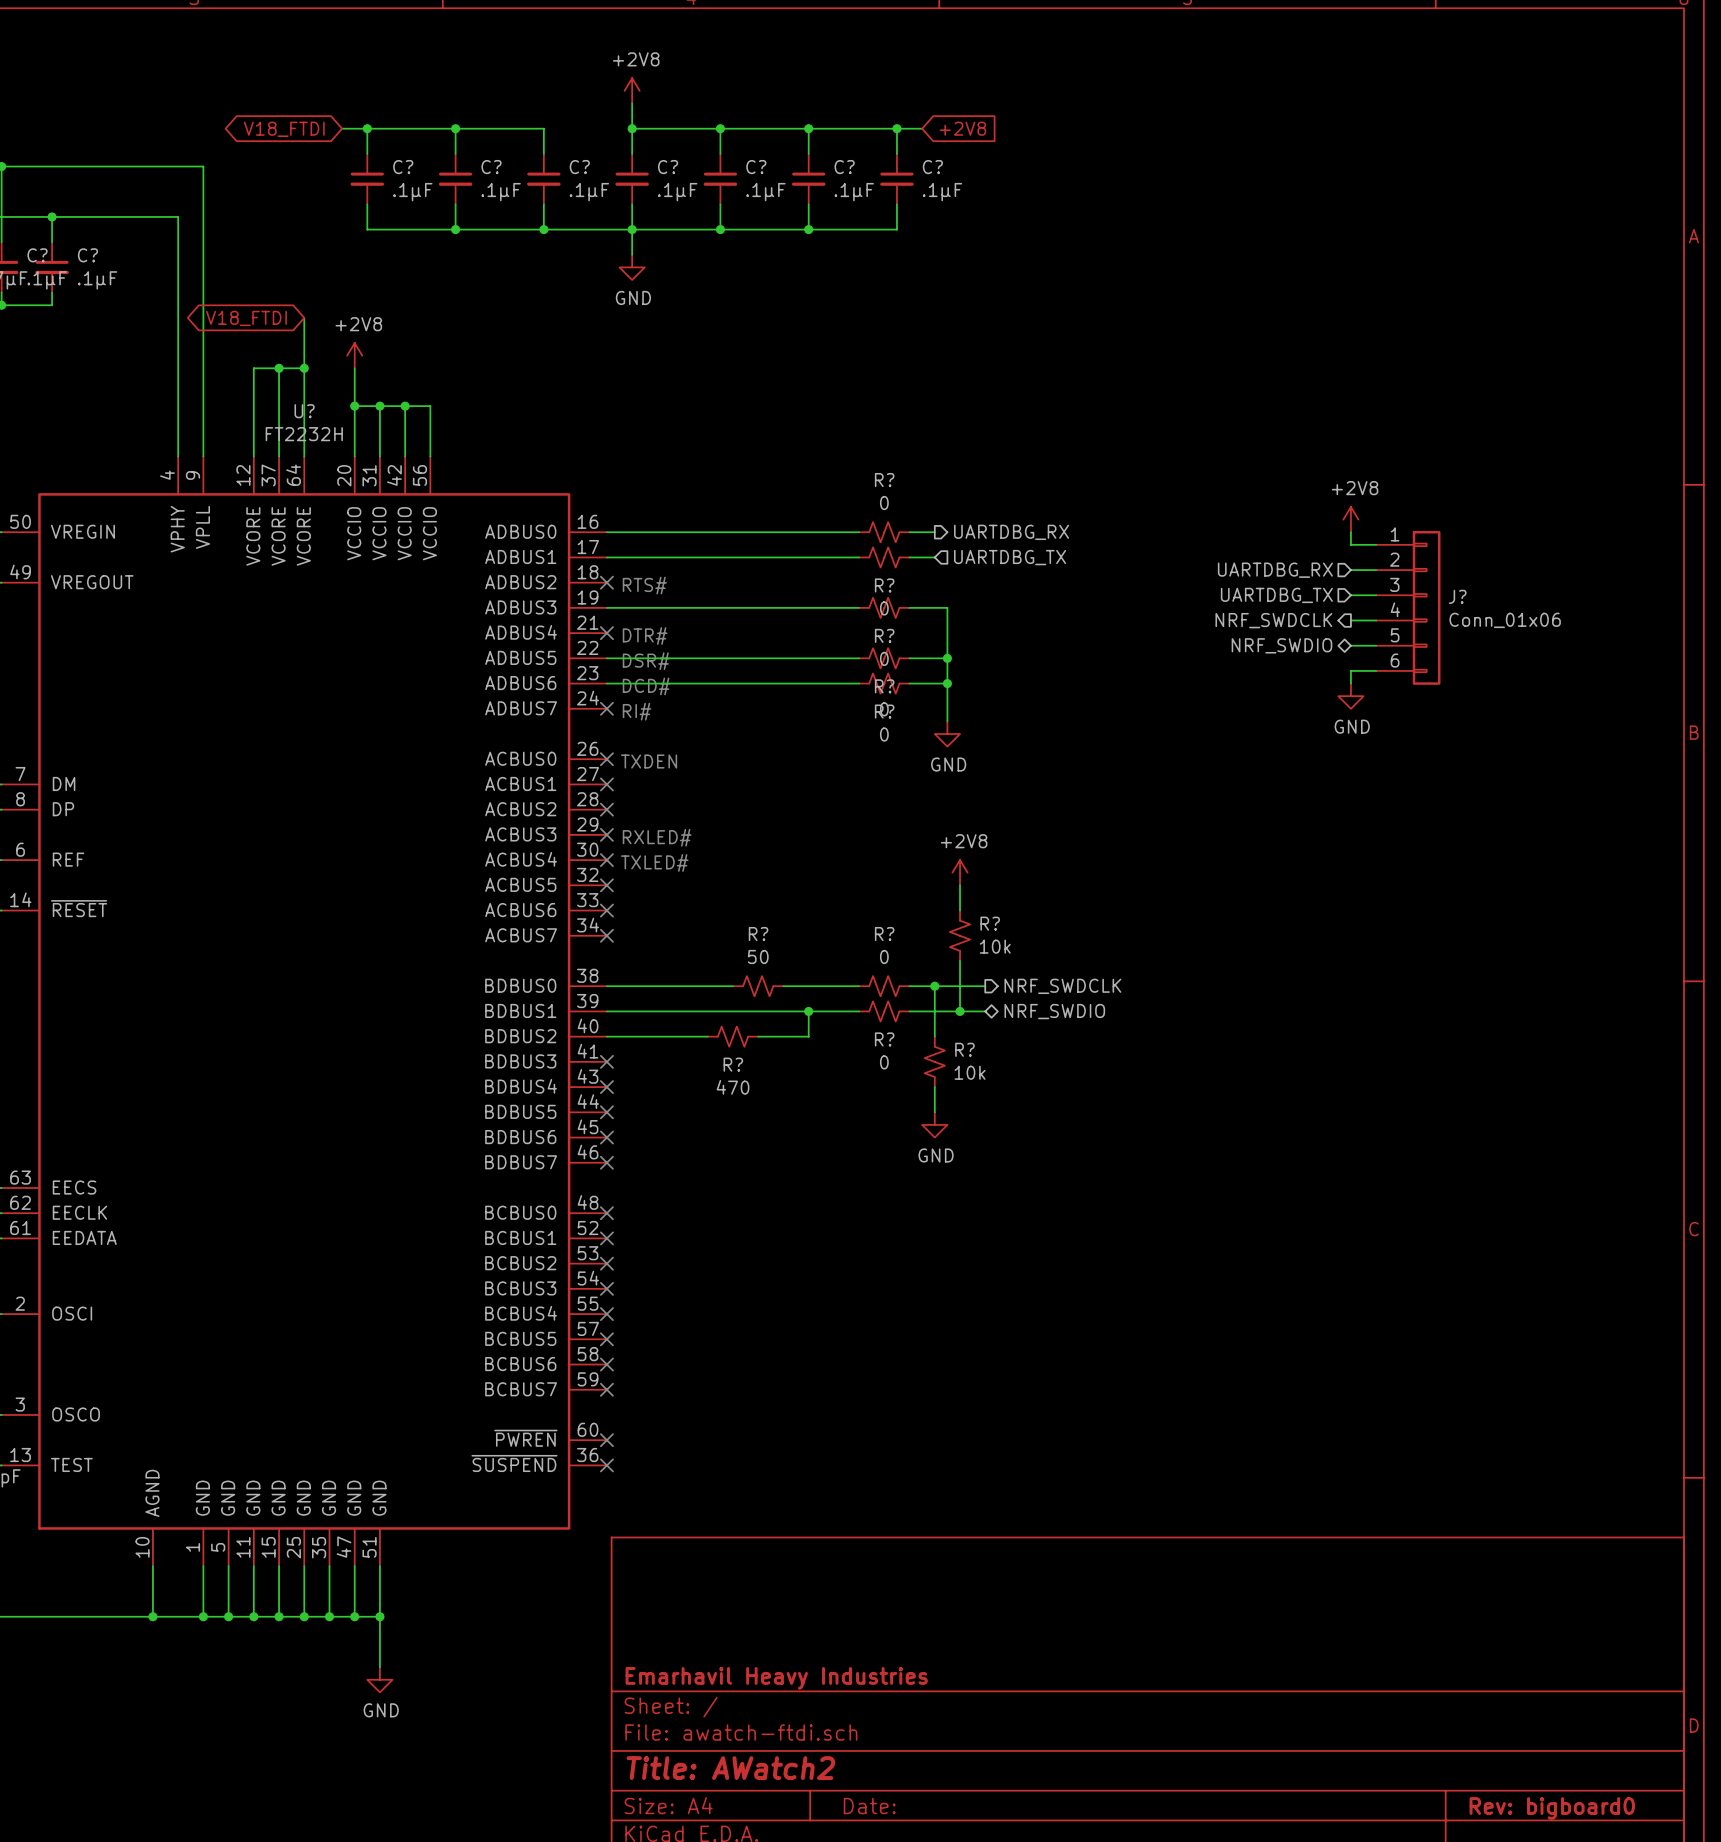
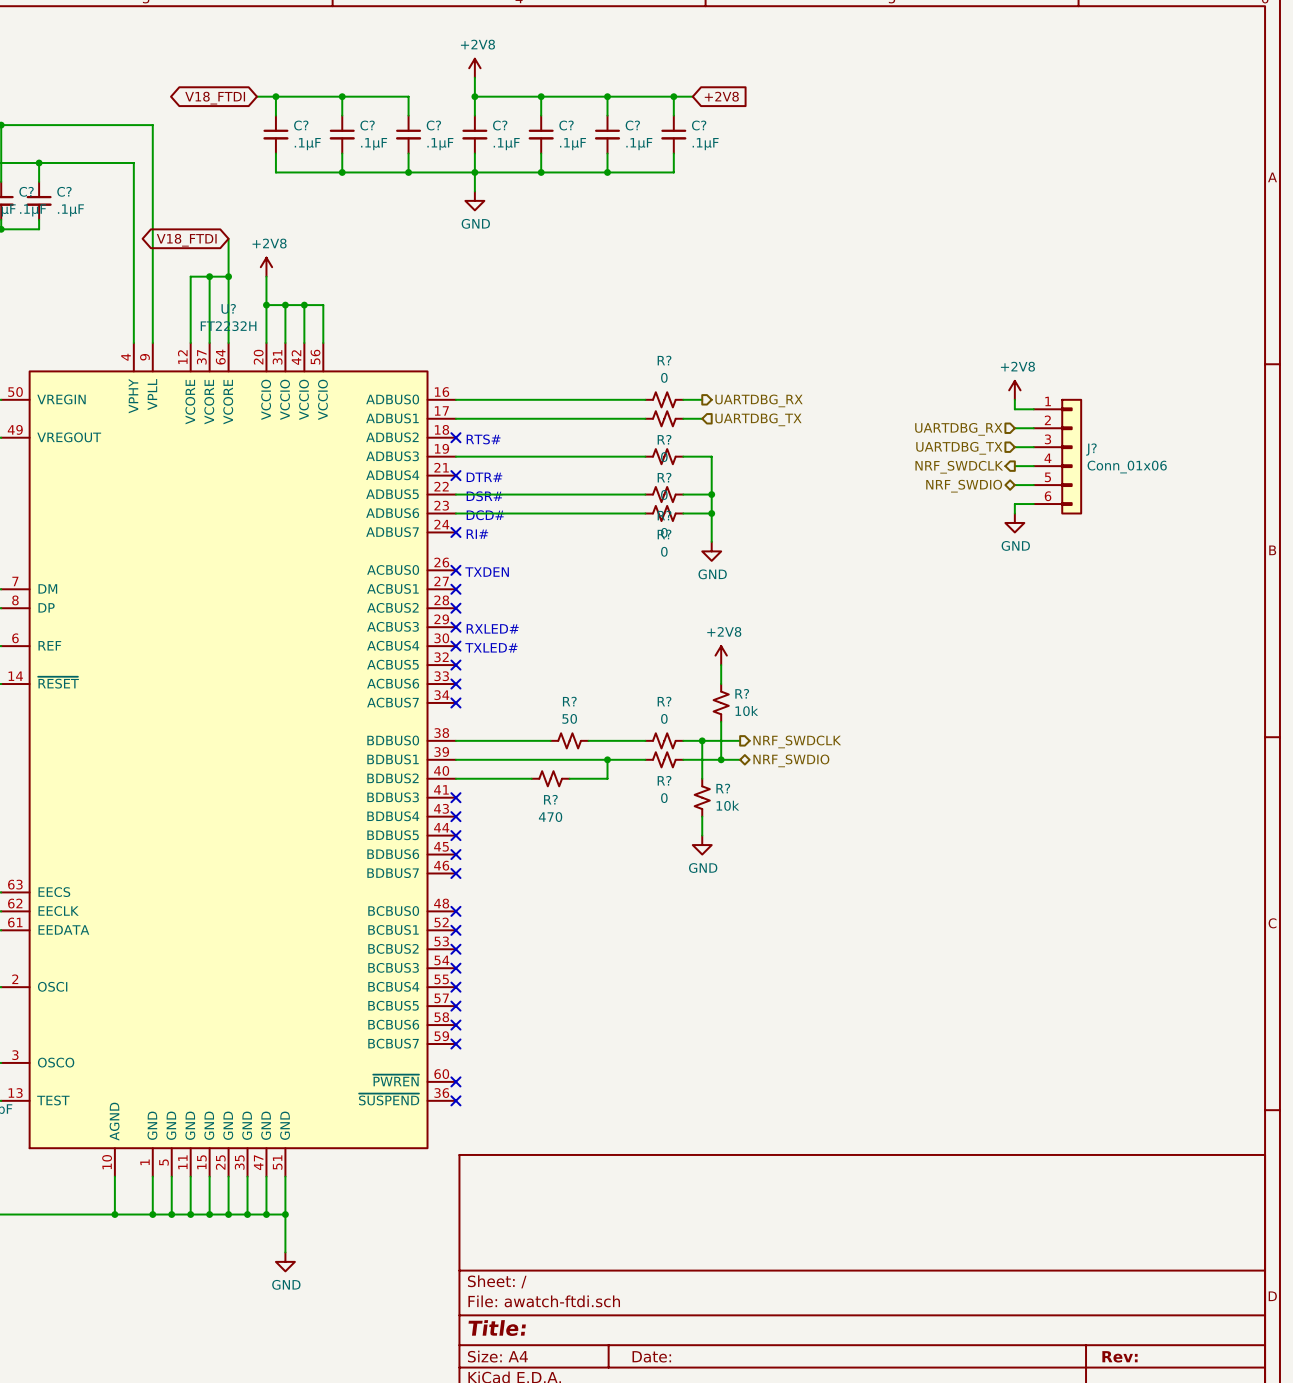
title block: Emarhavil Heavy Industries (776, 1678) -> none
title block: Title: AWatch2 (730, 1768) -> Title: (497, 1328)
title block: Rev: bigboard0 (1552, 1808) -> Rev: (1119, 1356)

